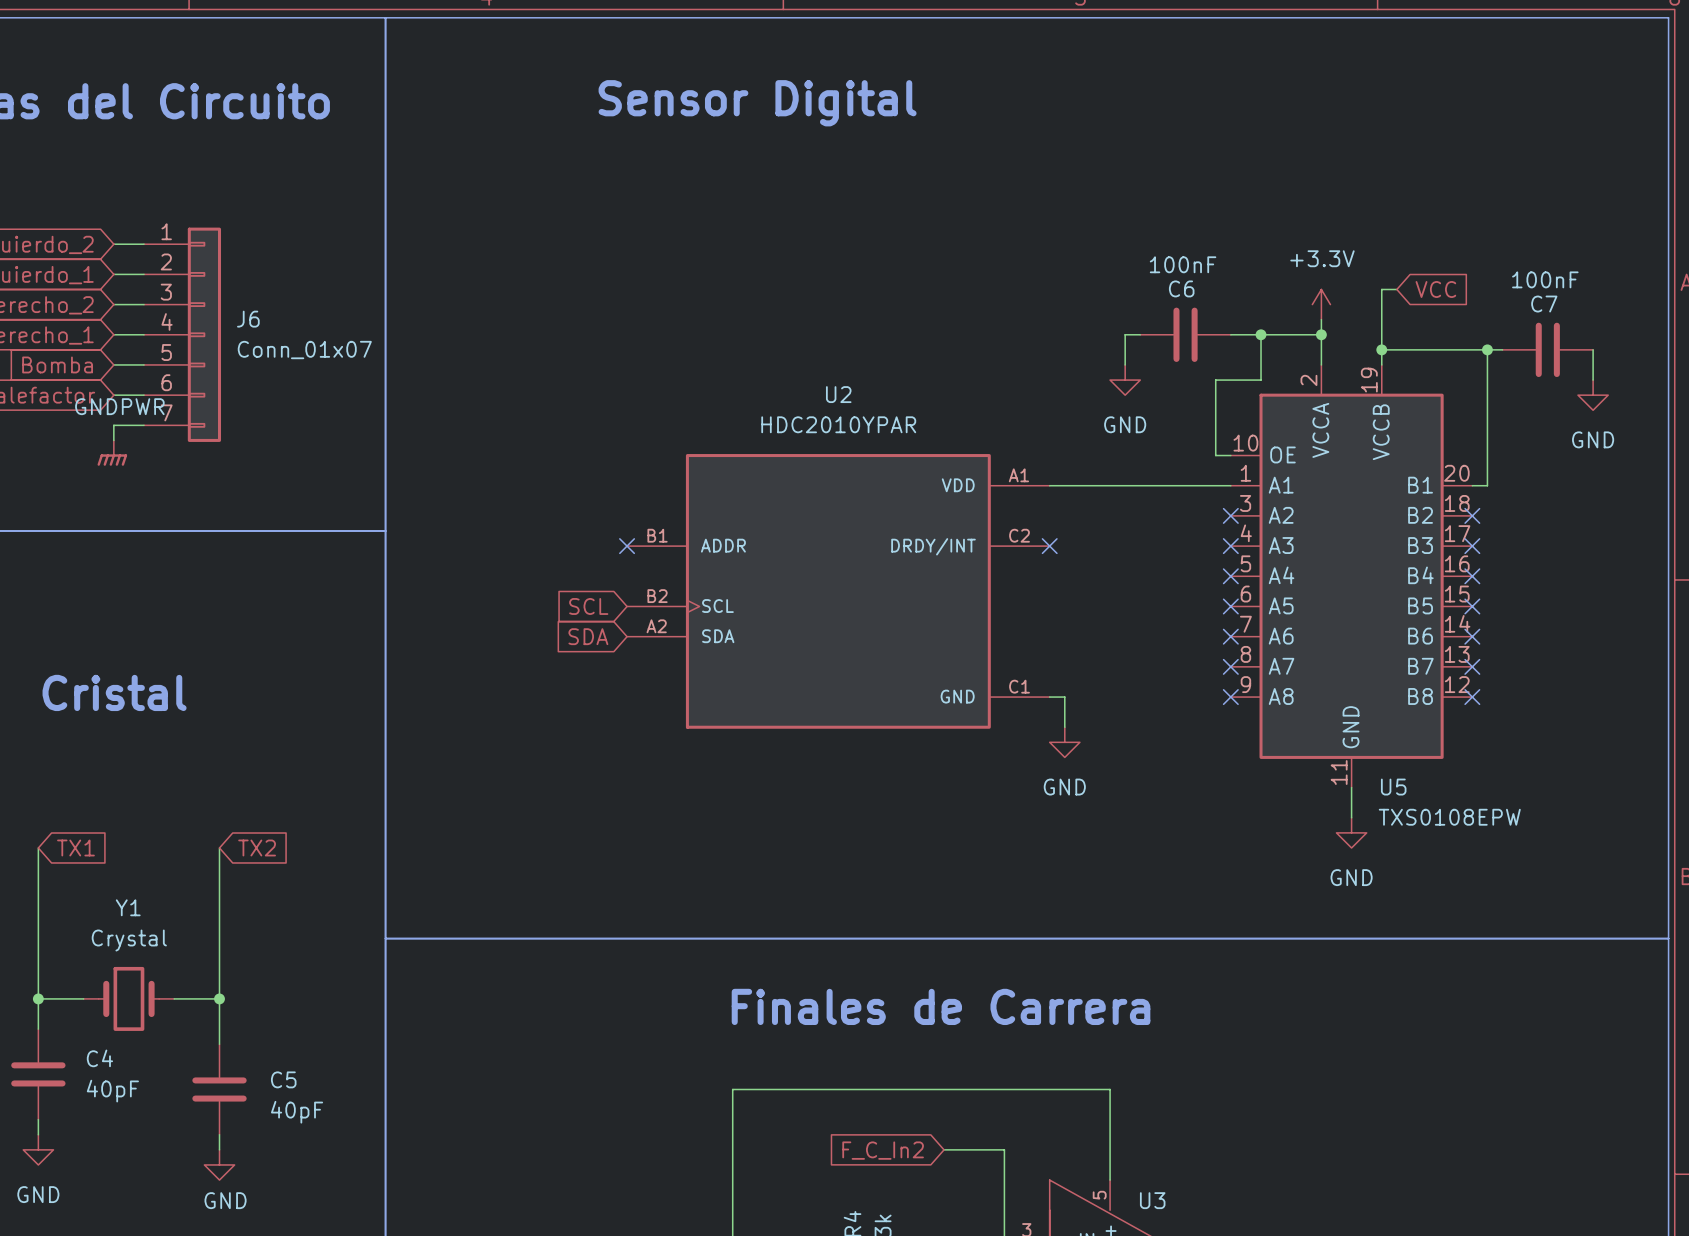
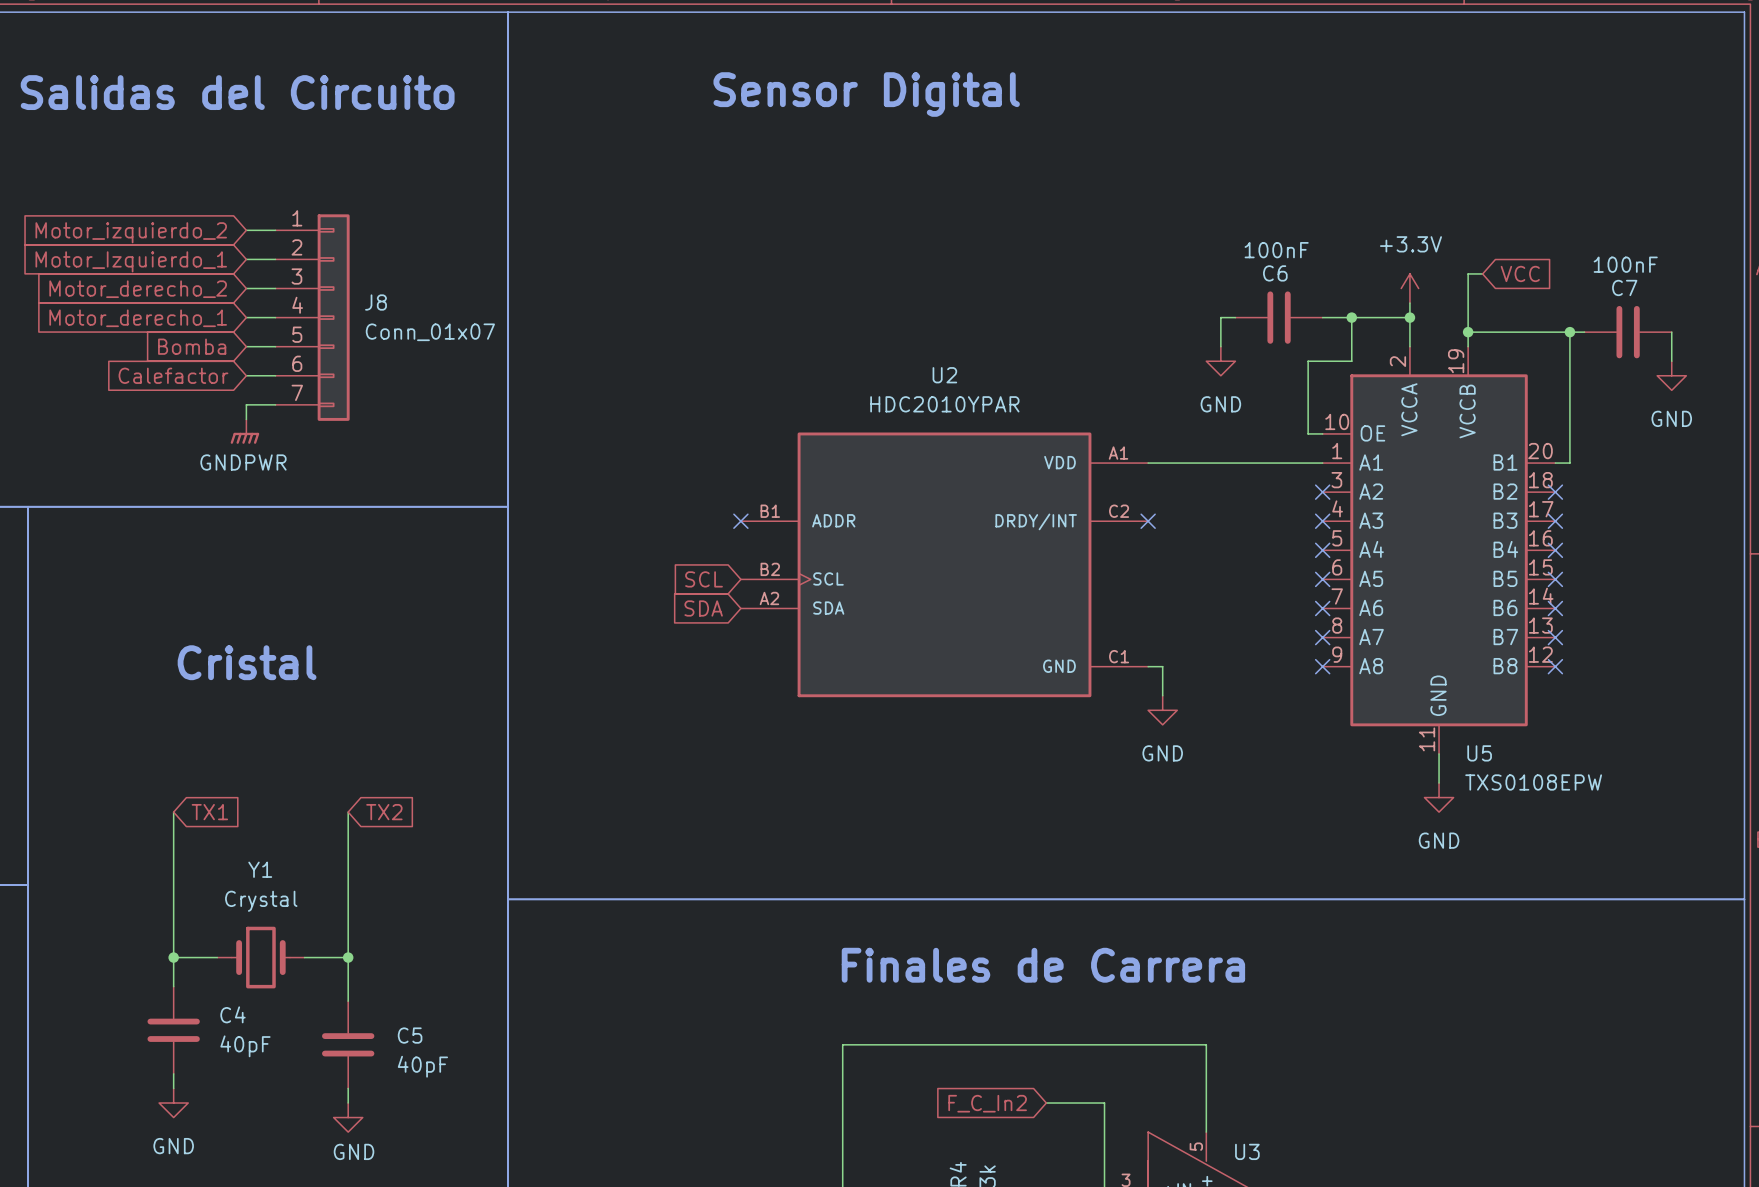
J6 name: J6 (248, 319) -> J8 (376, 302)
power symbol text position: GNDPWR (119, 406) -> GNDPWR (243, 462)

